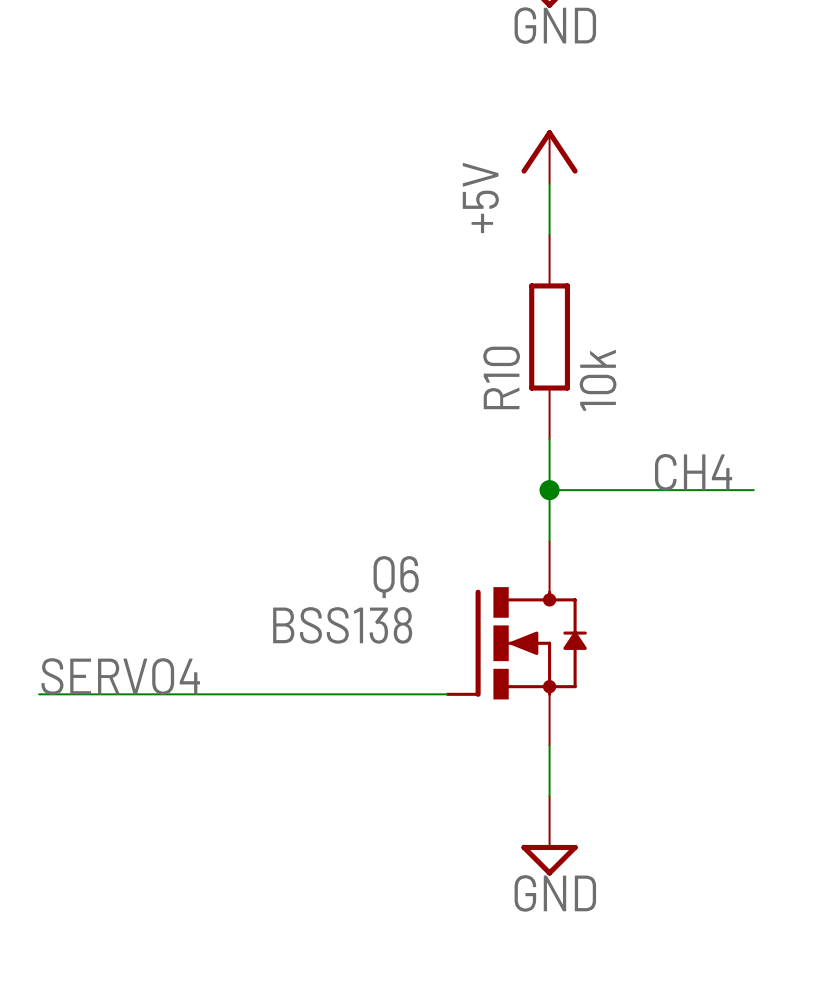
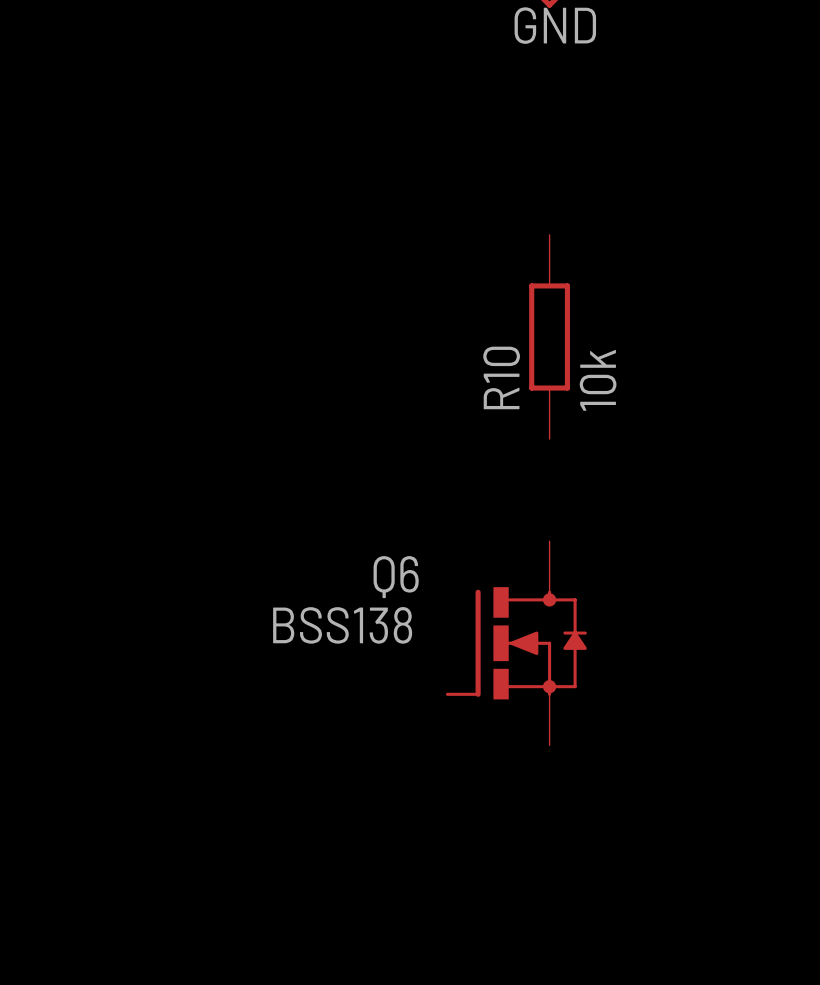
power symbol: +5V (549, 157) -> none
wire: (549, 183) (549, 234) -> none
wire: (549, 439) (549, 541) -> none
label: CH4 (693, 472) -> none
wire: (549, 490) (753, 490) -> none
junction: (549, 490) -> none
label: SERVO4 (120, 676) -> none
wire: (39, 694) (447, 694) -> none
wire: (549, 745) (549, 796) -> none
power symbol: GND (549, 835) -> none

